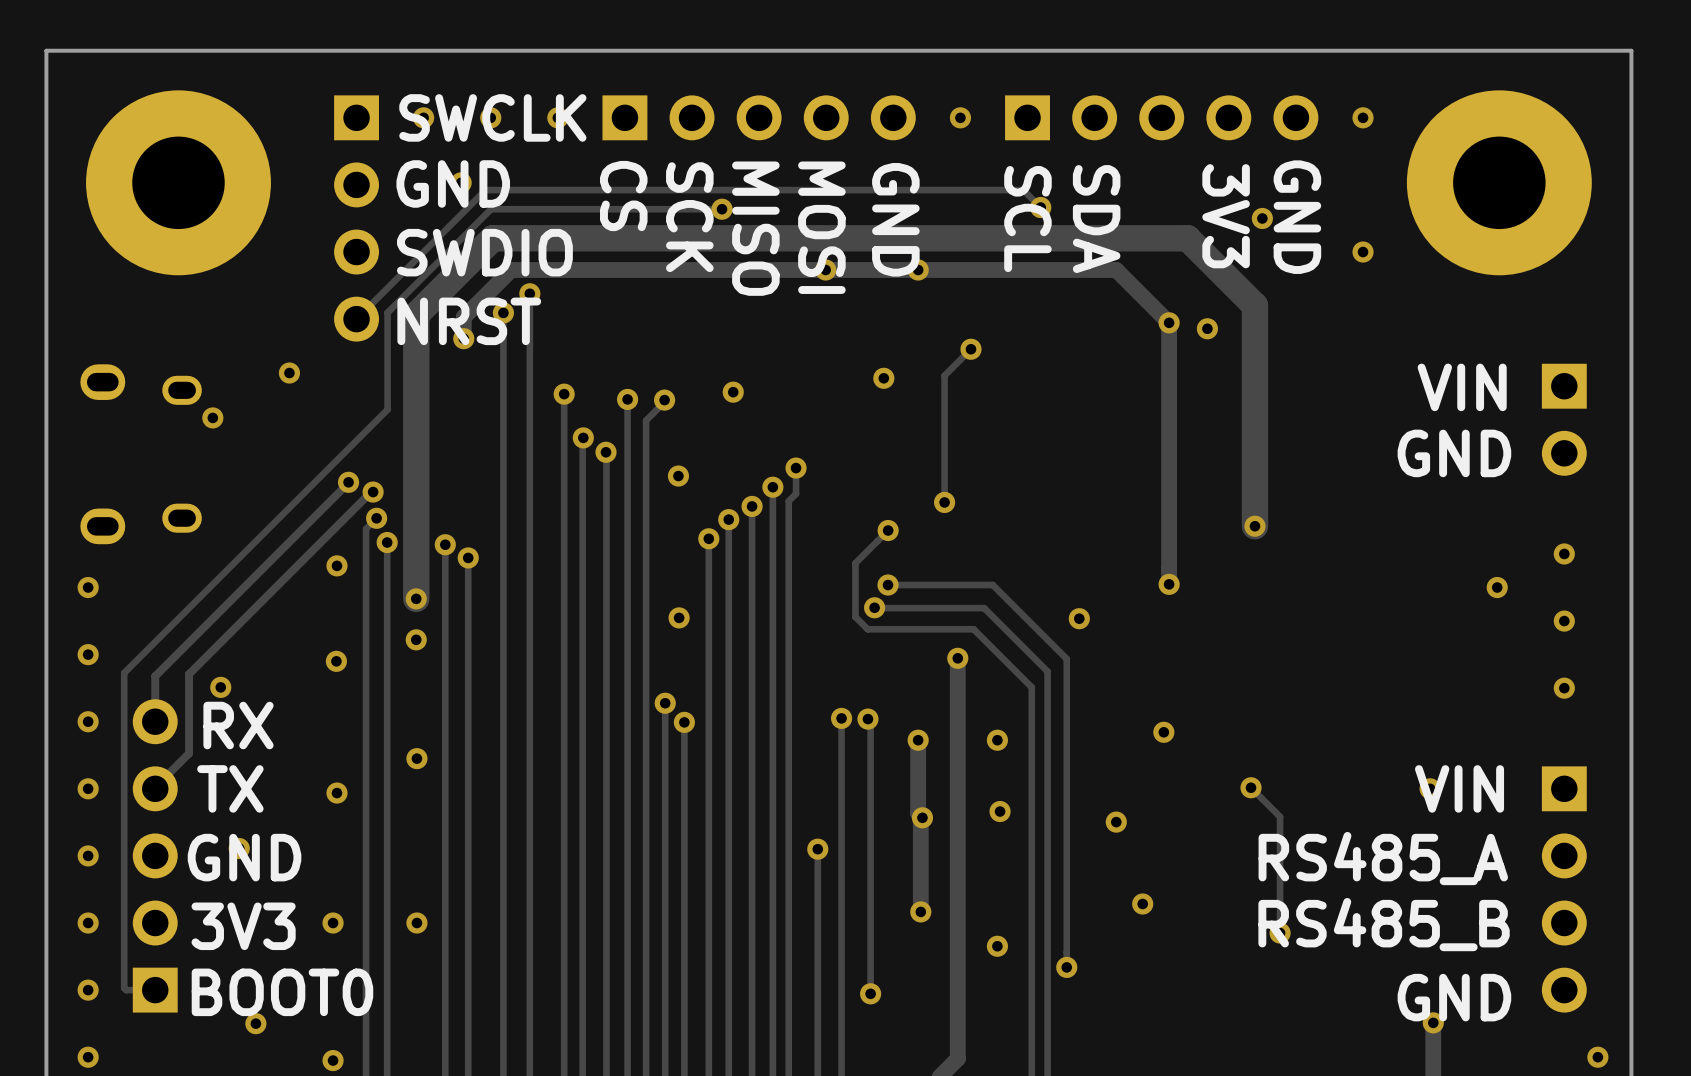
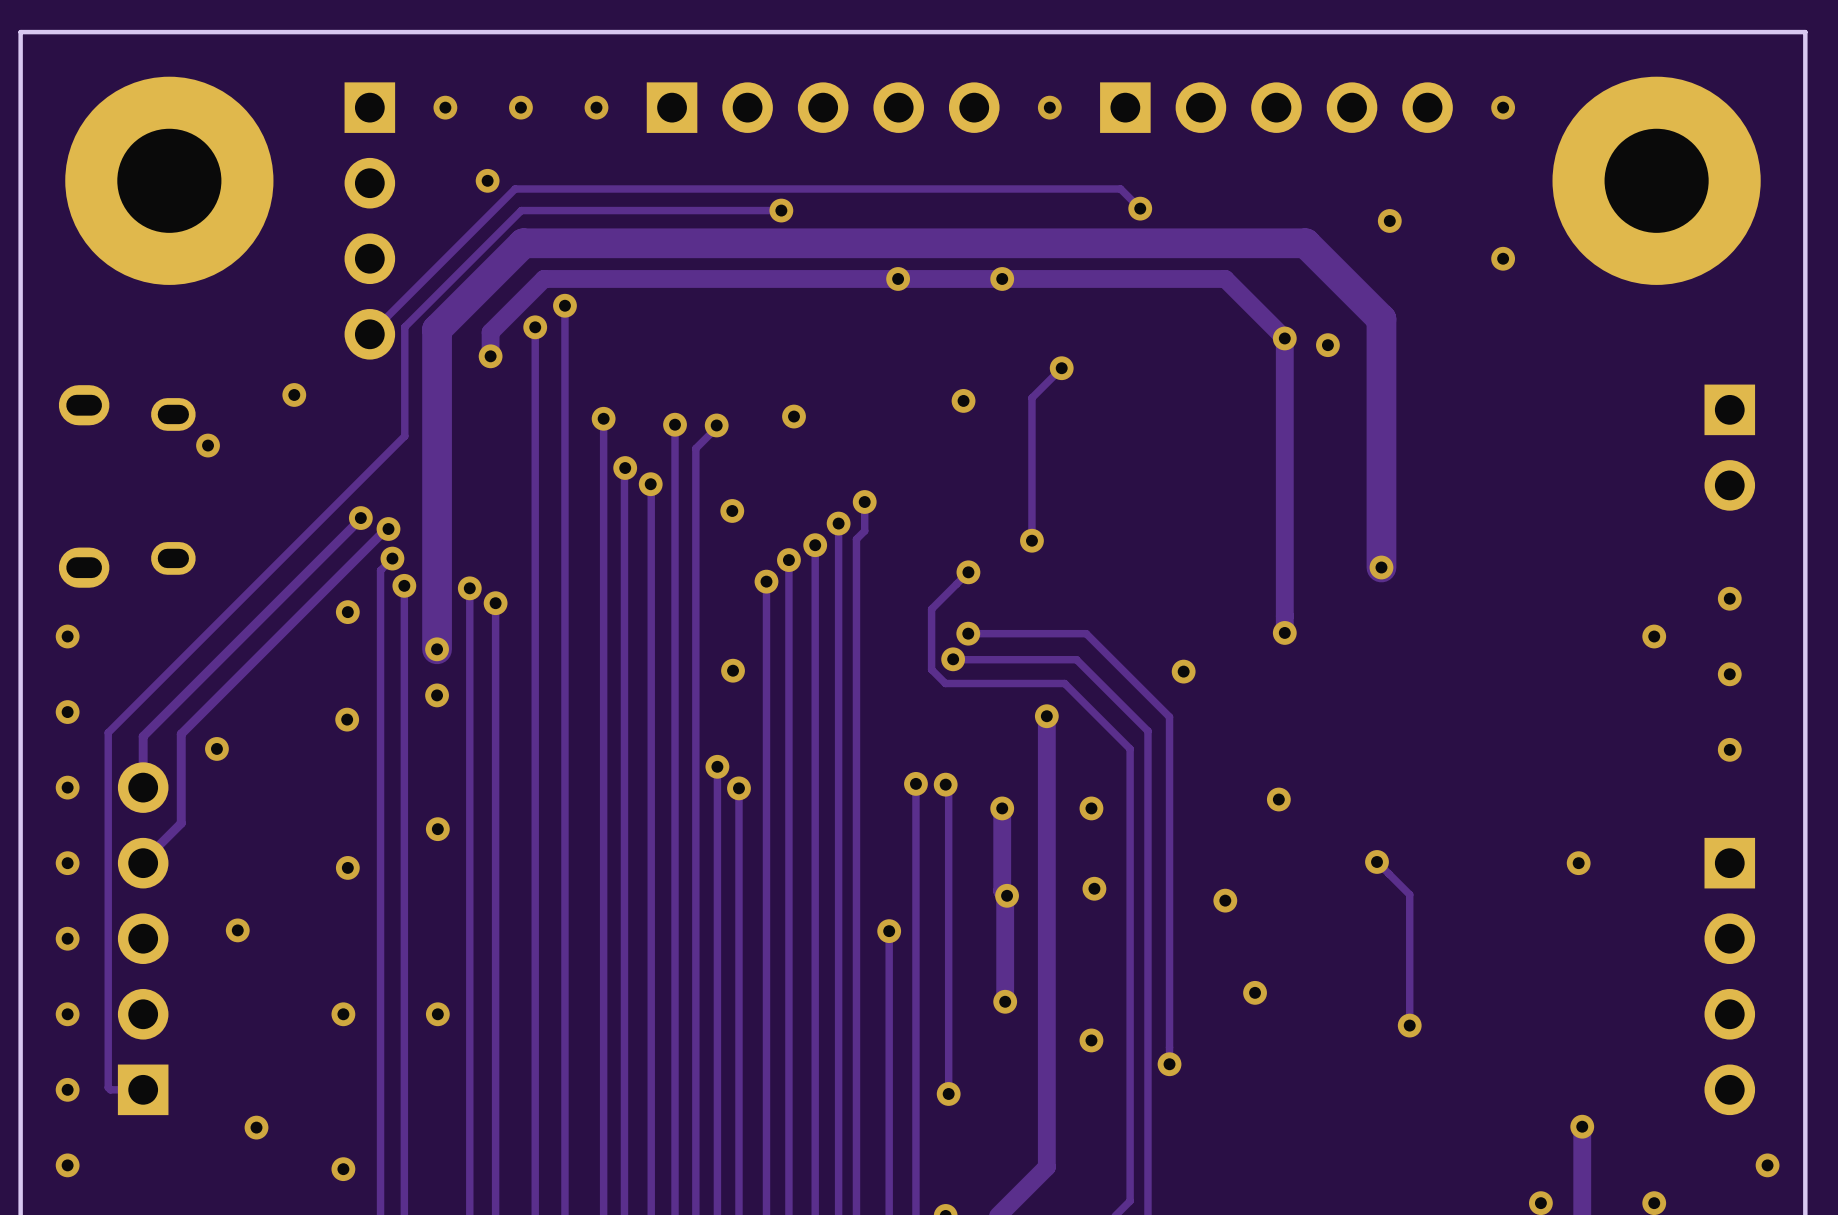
text: SWCLK (492, 117) -> none
text: GND (453, 183) -> none
text: CS (623, 196) -> none
text: 3V3 (1226, 216) -> none
text: SCK (689, 217) -> none
text: GND (1297, 217) -> none
text: GND (895, 219) -> none
text: SCL (1027, 219) -> none
text: SDA (1096, 219) -> none
text: MOSI (821, 227) -> none
text: MISO (755, 228) -> none
text: SWDIO (484, 252) -> none
text: NRST (469, 321) -> none
text: VIN (1462, 387) -> none
text: GND (1454, 453) -> none
text: RX (238, 725) -> none
text: TX (230, 788) -> none
text: VIN (1459, 788) -> none
text: GND (244, 857) -> none
text: RS485_A (1383, 858) -> none
text: RS485_B (1384, 924) -> none
text: 3V3 (243, 926) -> none
text: BOOT0 (282, 992) -> none
text: GND (1454, 997) -> none

